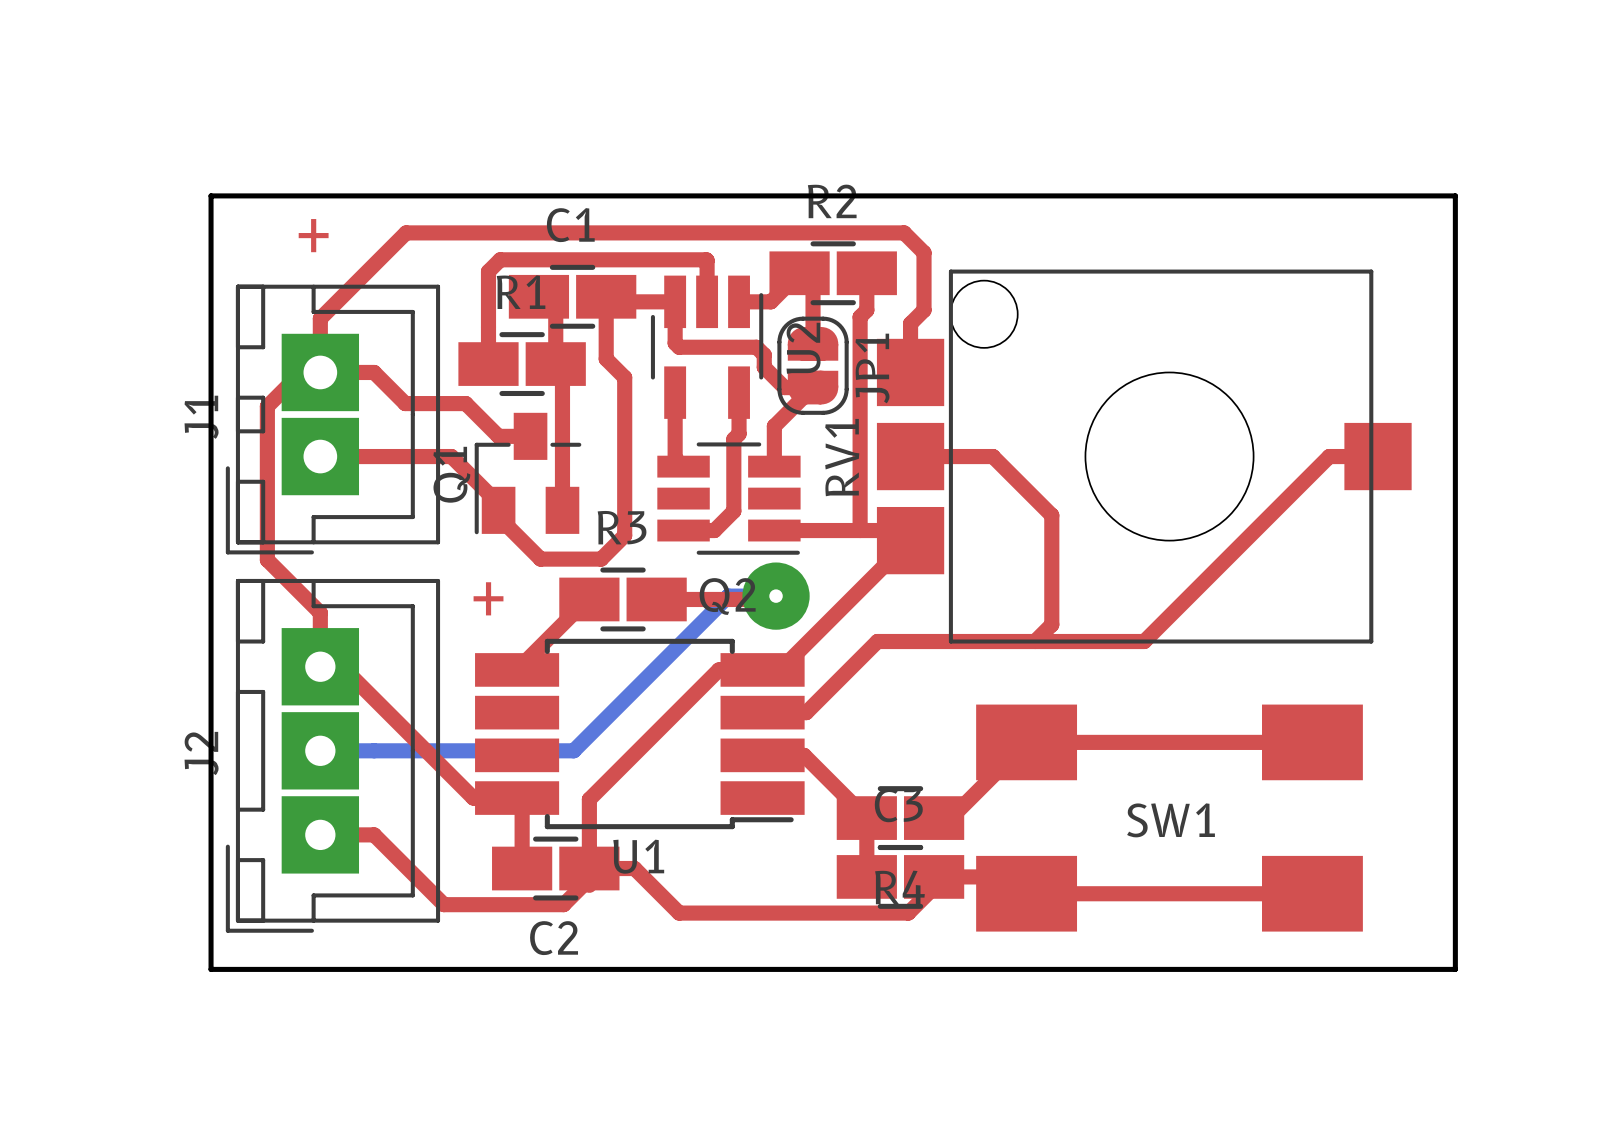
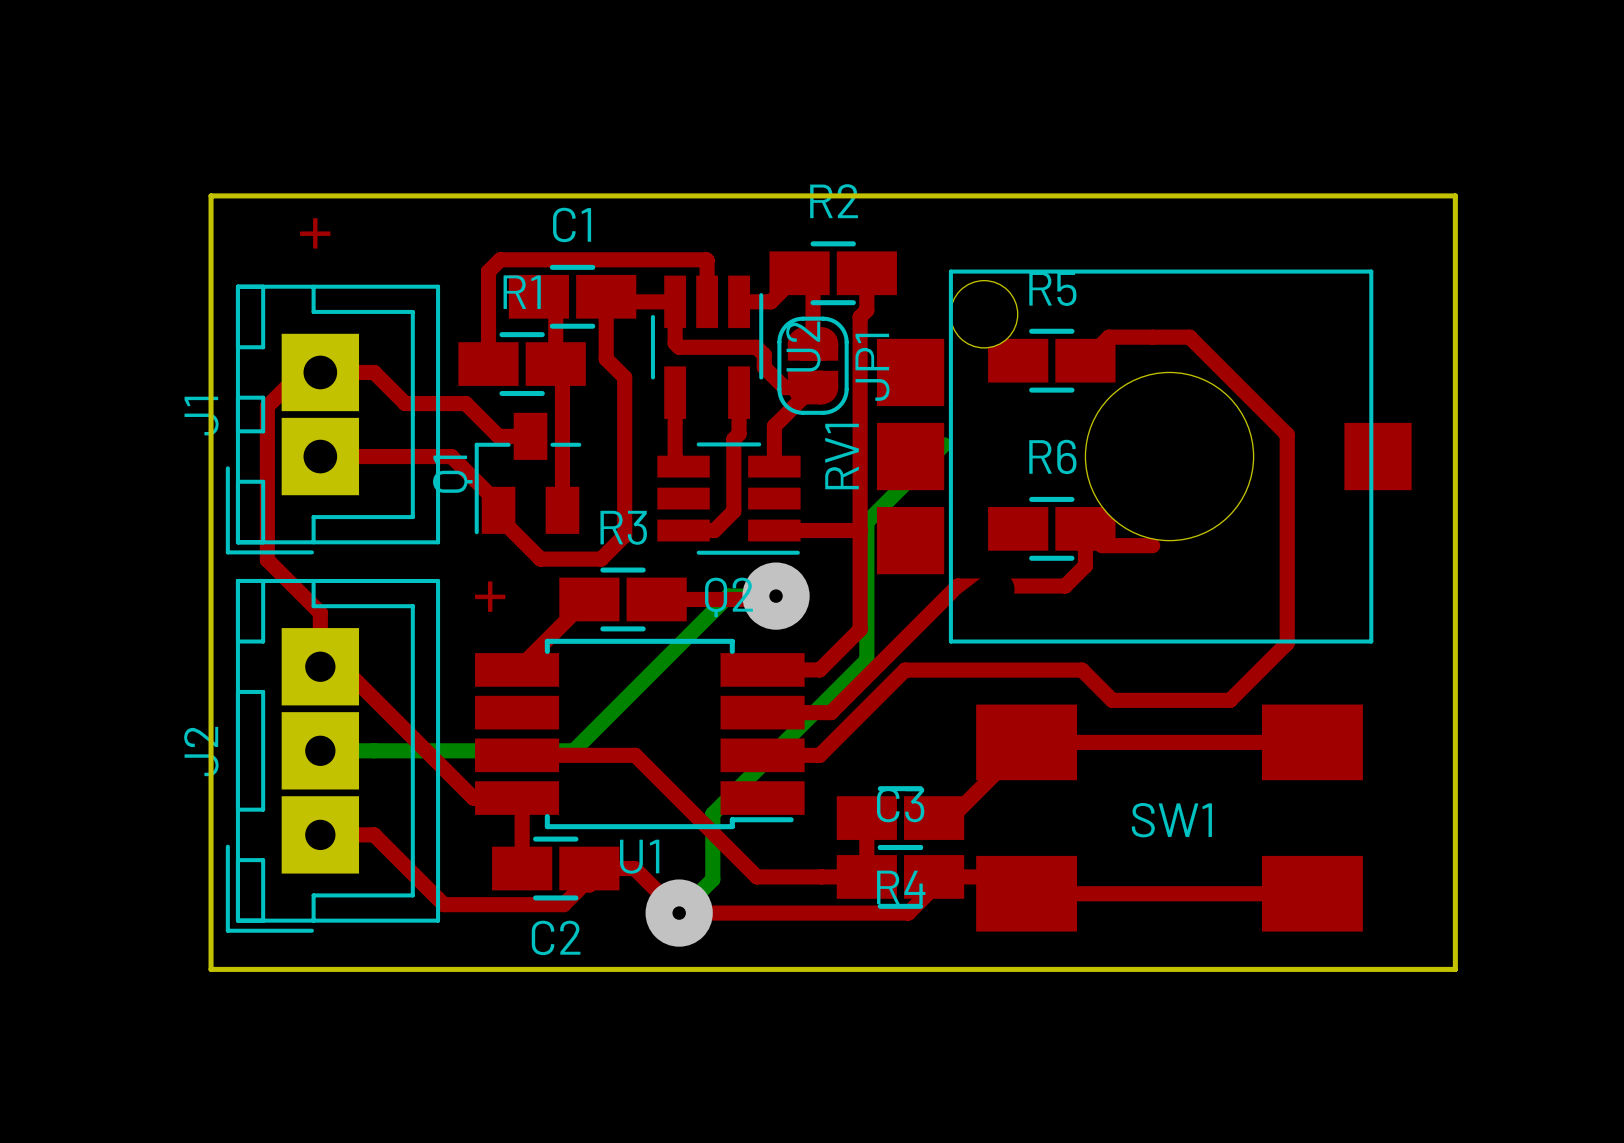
R5: none -> (1051, 360)
top track: (320, 372) (320, 318) (406, 232) (904, 232) (924, 252) (924, 310) (910, 323) (910, 372) -> none
bottom track: none -> (944, 444) (866, 522) (866, 660) (712, 814) (712, 879) (679, 913)
top track: (910, 456) (992, 456) (1051, 515) (1051, 624) (1034, 641) -> none
top track: (1378, 456) (1329, 456) (1144, 641) (877, 641) (806, 712) -> (1152, 545) (1102, 545) (1085, 528) (1085, 565) (1065, 586) (957, 586) (831, 712) (806, 712)
R6: none -> (1051, 528)
top track: (860, 530) (900, 530) (910, 540) (780, 669) -> (860, 530) (860, 629) (819, 669) (780, 669)
top track: (762, 669) (718, 669) (589, 799) (589, 868) -> none
top track: none -> (517, 755) (635, 755) (756, 876) (866, 876)
top track: (804, 755) (866, 818) -> (804, 755) (819, 755) (905, 670) (1082, 670) (1112, 700) (1230, 700) (1287, 643) (1287, 434) (1189, 337) (1108, 337) (1085, 360)
via: none -> (679, 913)

